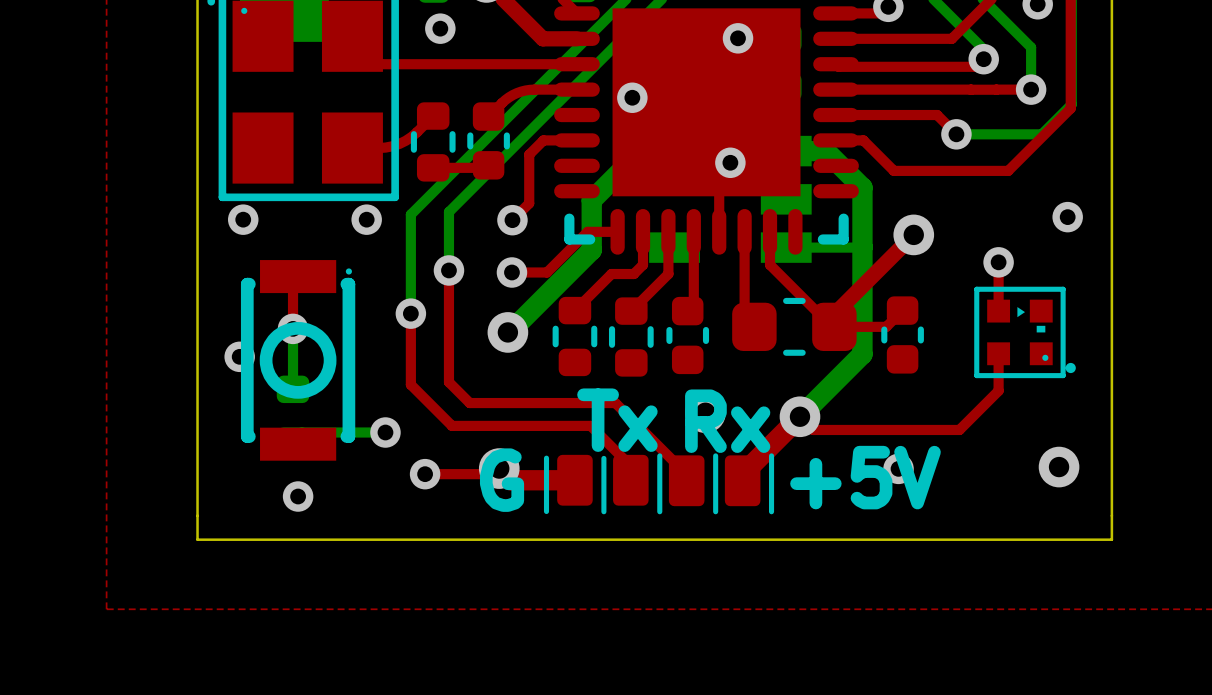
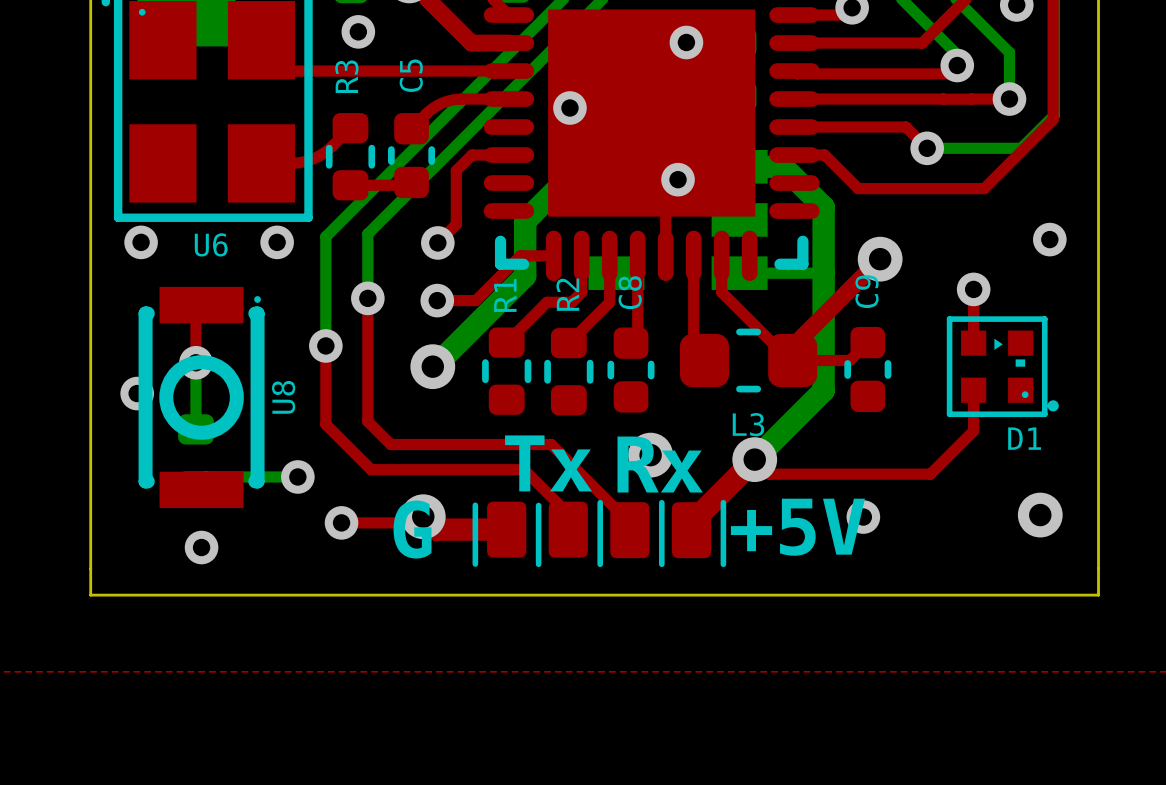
R3 name: none -> R3 (346, 76)
C5 name: none -> C5 (411, 75)
U6 name: none -> U6 (211, 244)
C9 name: none -> C9 (867, 291)
C8 name: none -> C8 (630, 292)
R2 name: none -> R2 (567, 294)
R1 name: none -> R1 (505, 295)
U8 name: none -> U8 (283, 397)
L3 name: none -> L3 (748, 424)
D1 name: none -> D1 (1024, 438)

